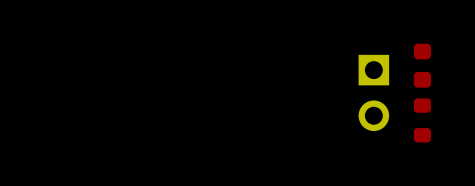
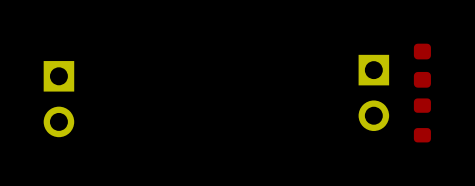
part: none -> (58, 99)

